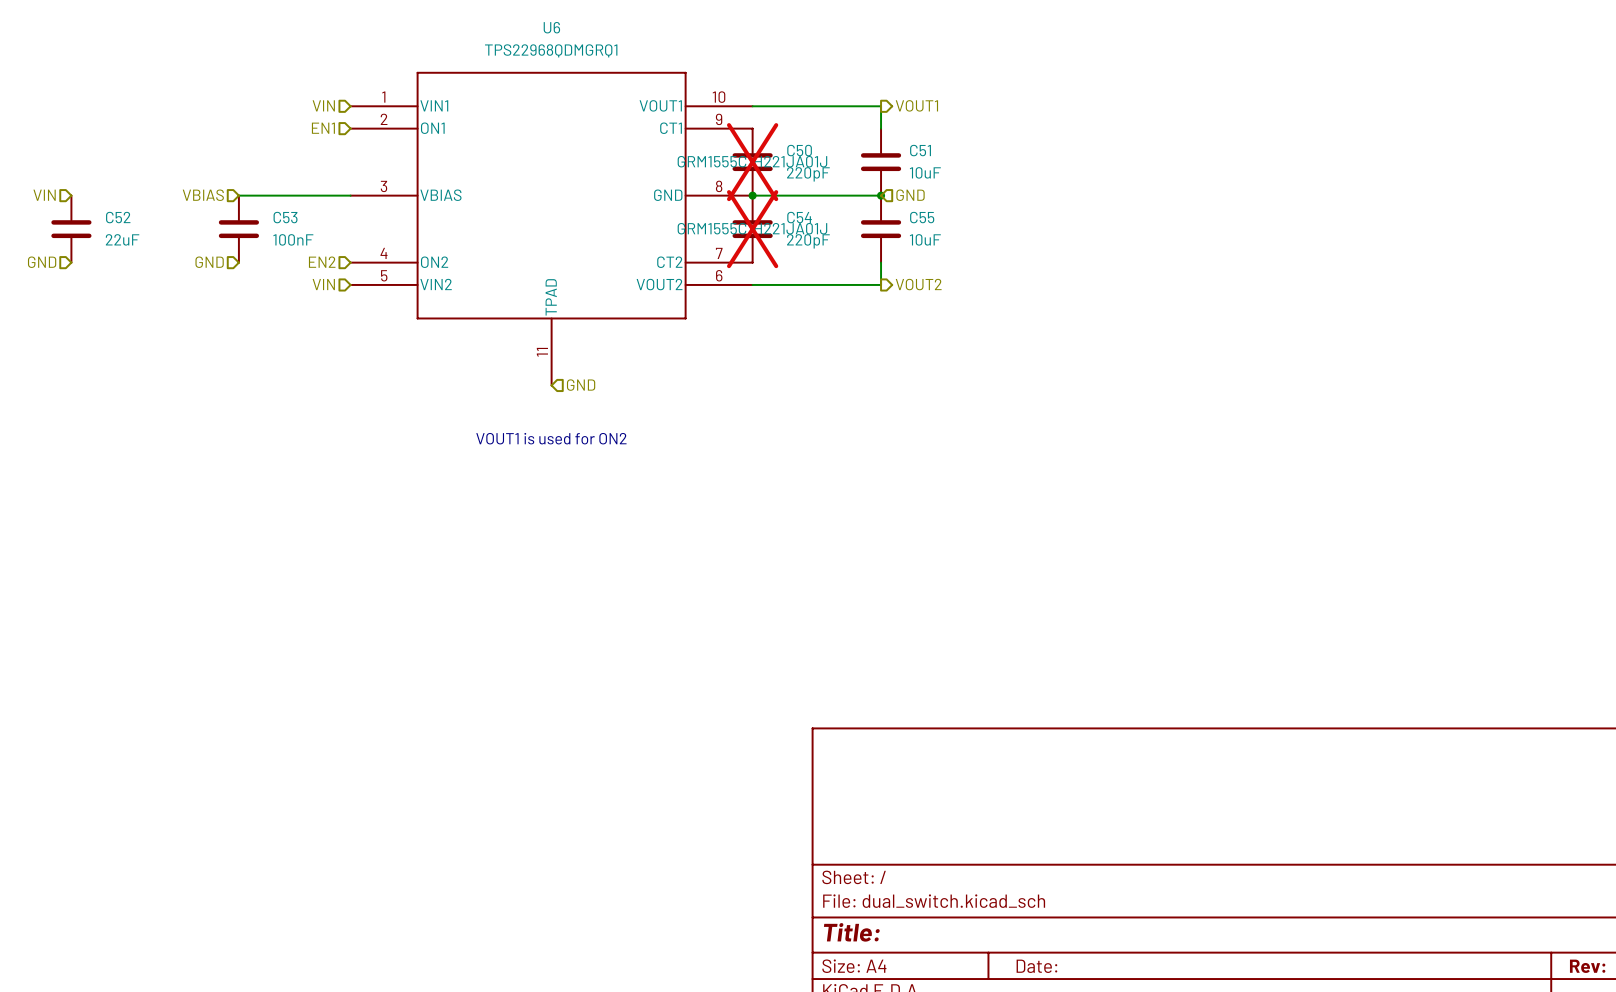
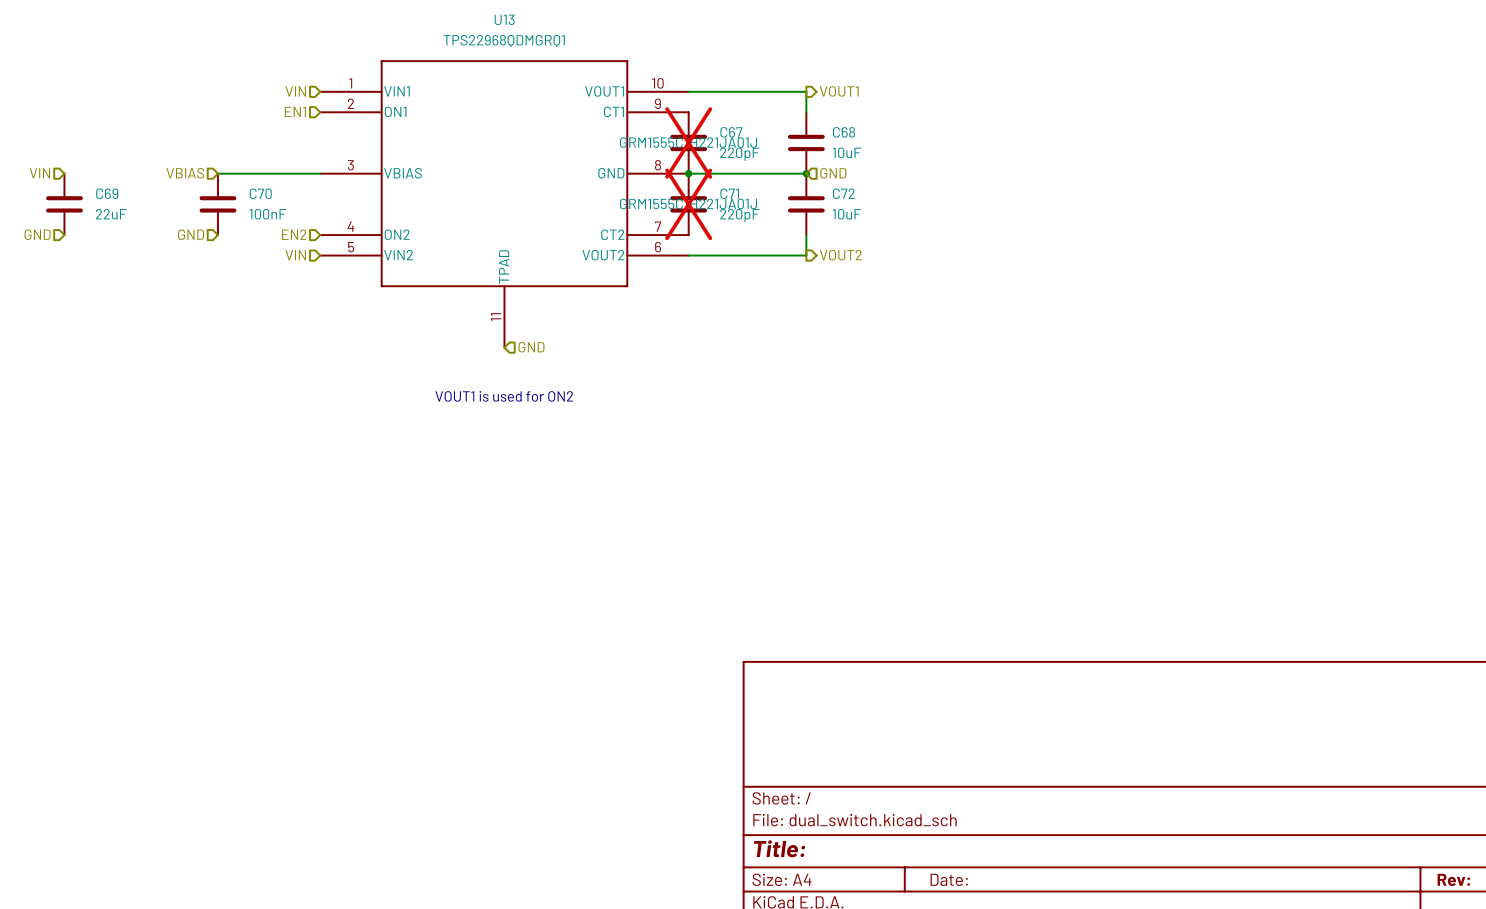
U6 name: U6 (551, 27) -> U13 (504, 19)
C50 name: C50 (799, 150) -> C67 (731, 132)
C51 name: C51 (920, 150) -> C68 (844, 132)
C52 name: C52 (118, 217) -> C69 (107, 193)
C53 name: C53 (285, 217) -> C70 (260, 193)
C54 name: C54 (799, 217) -> C71 (729, 193)
C55 name: C55 (922, 217) -> C72 (843, 193)

